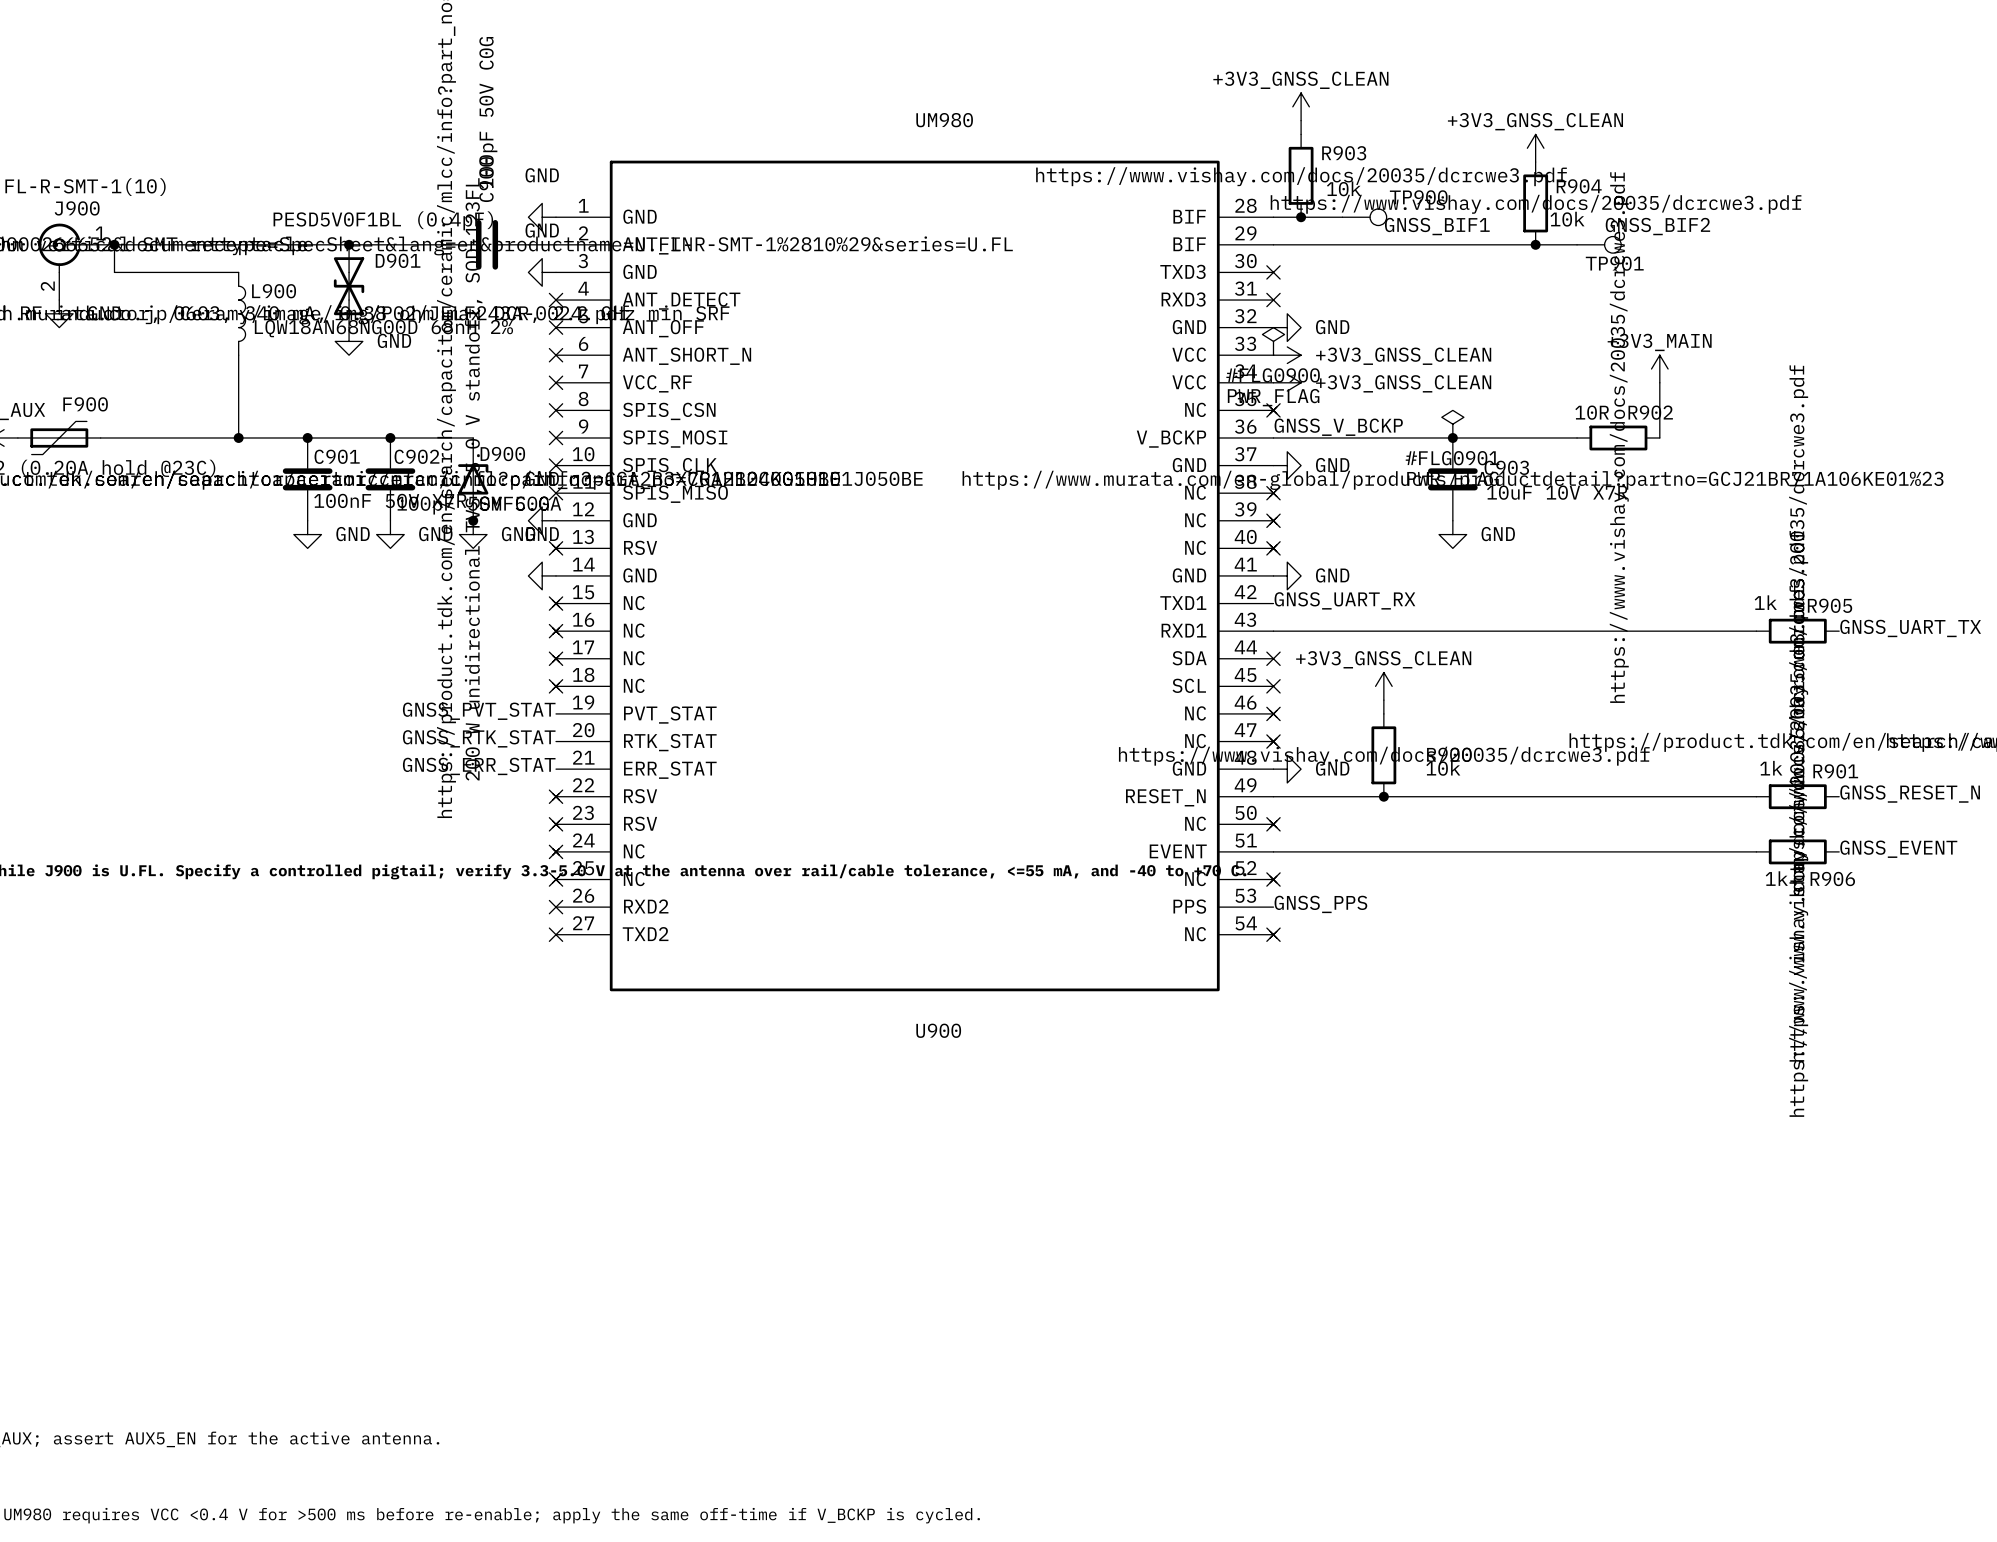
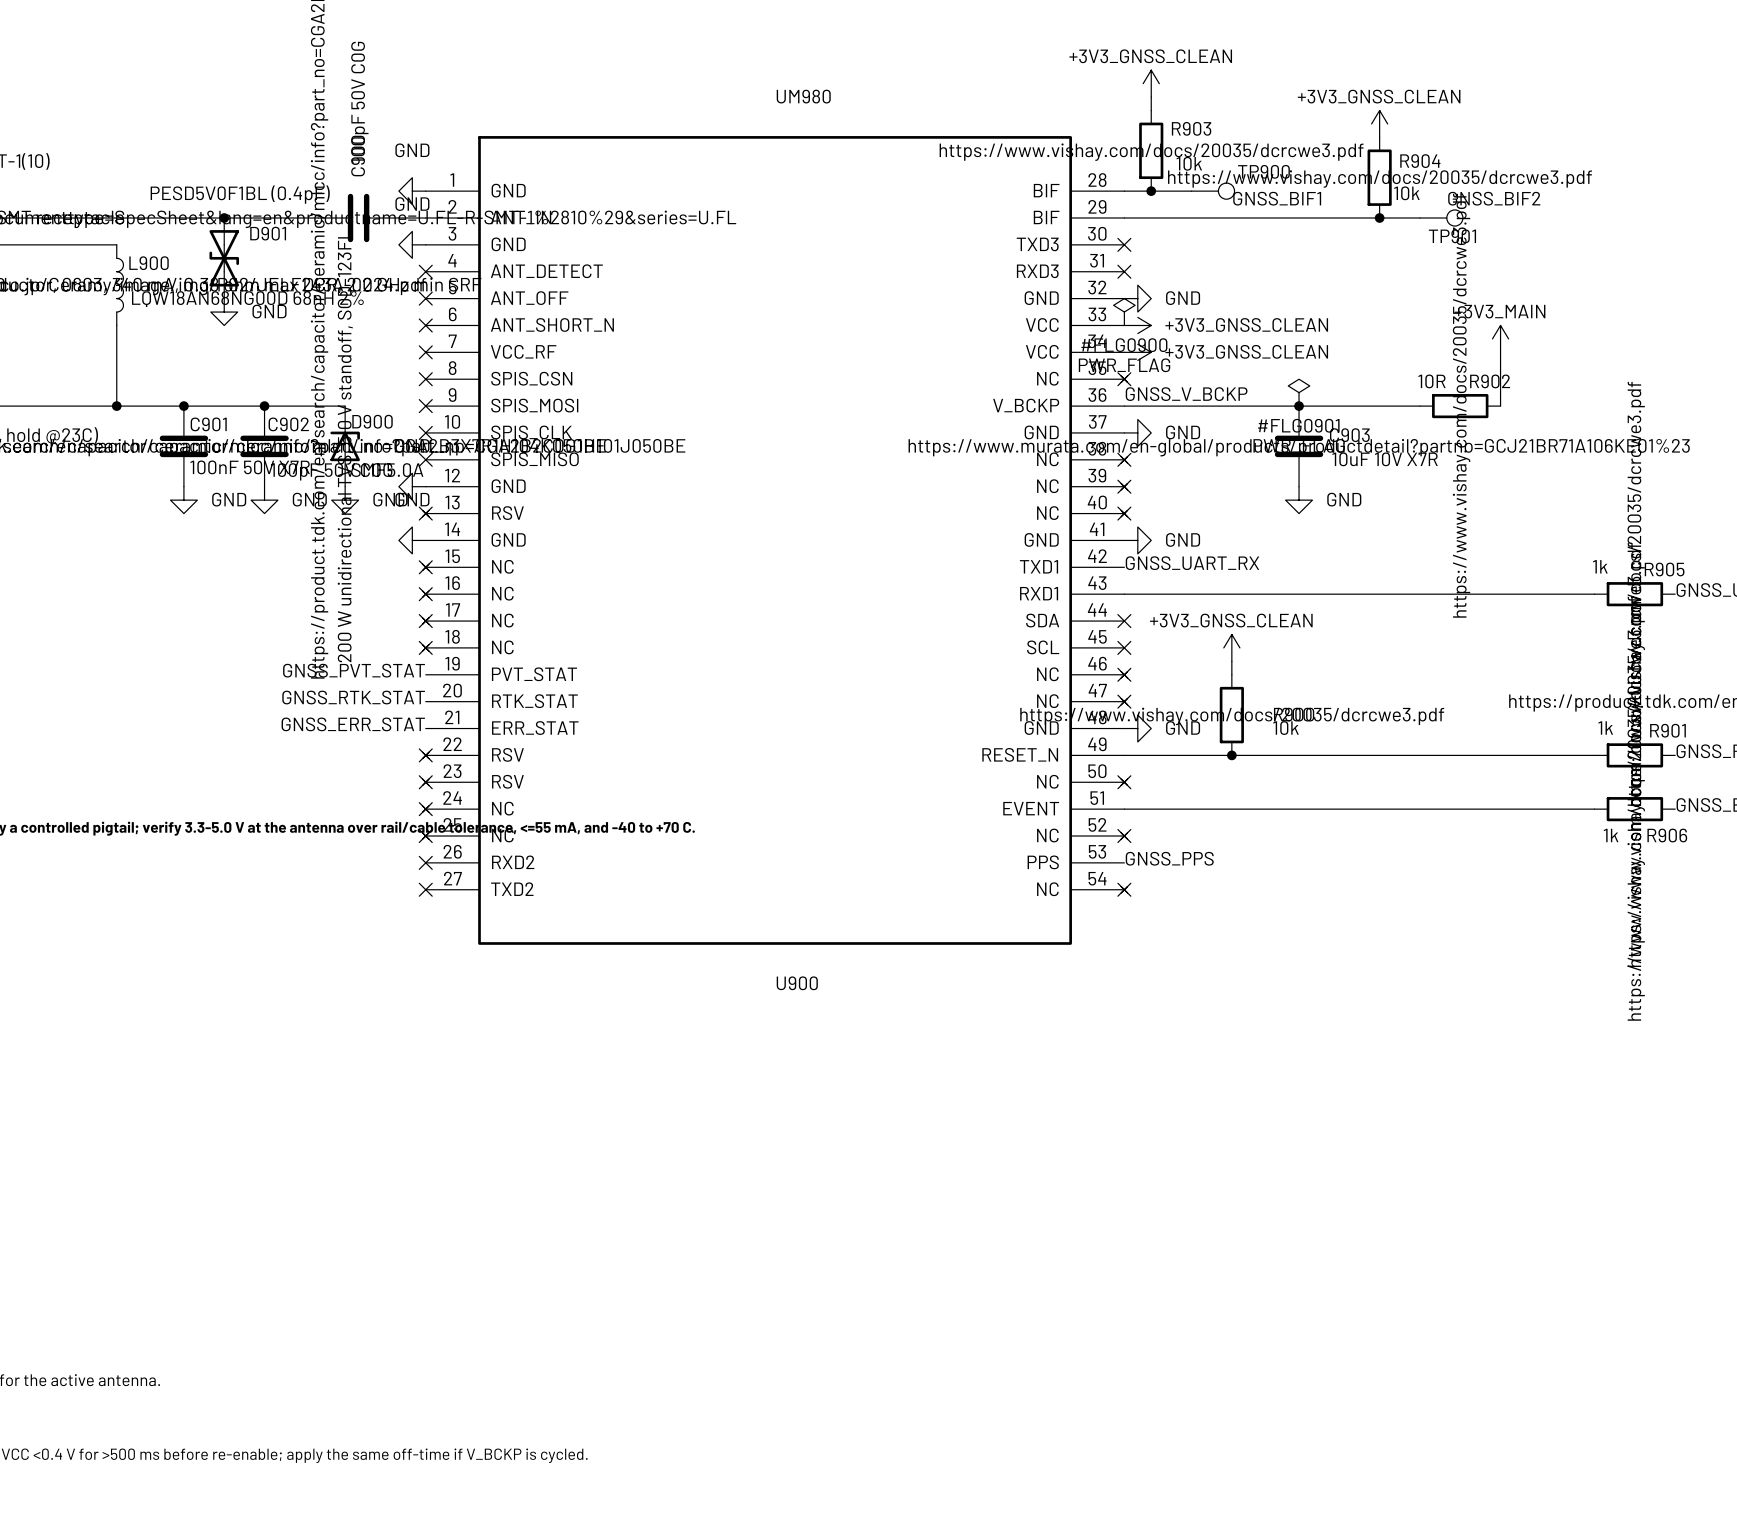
junction: (473, 520) -> none

